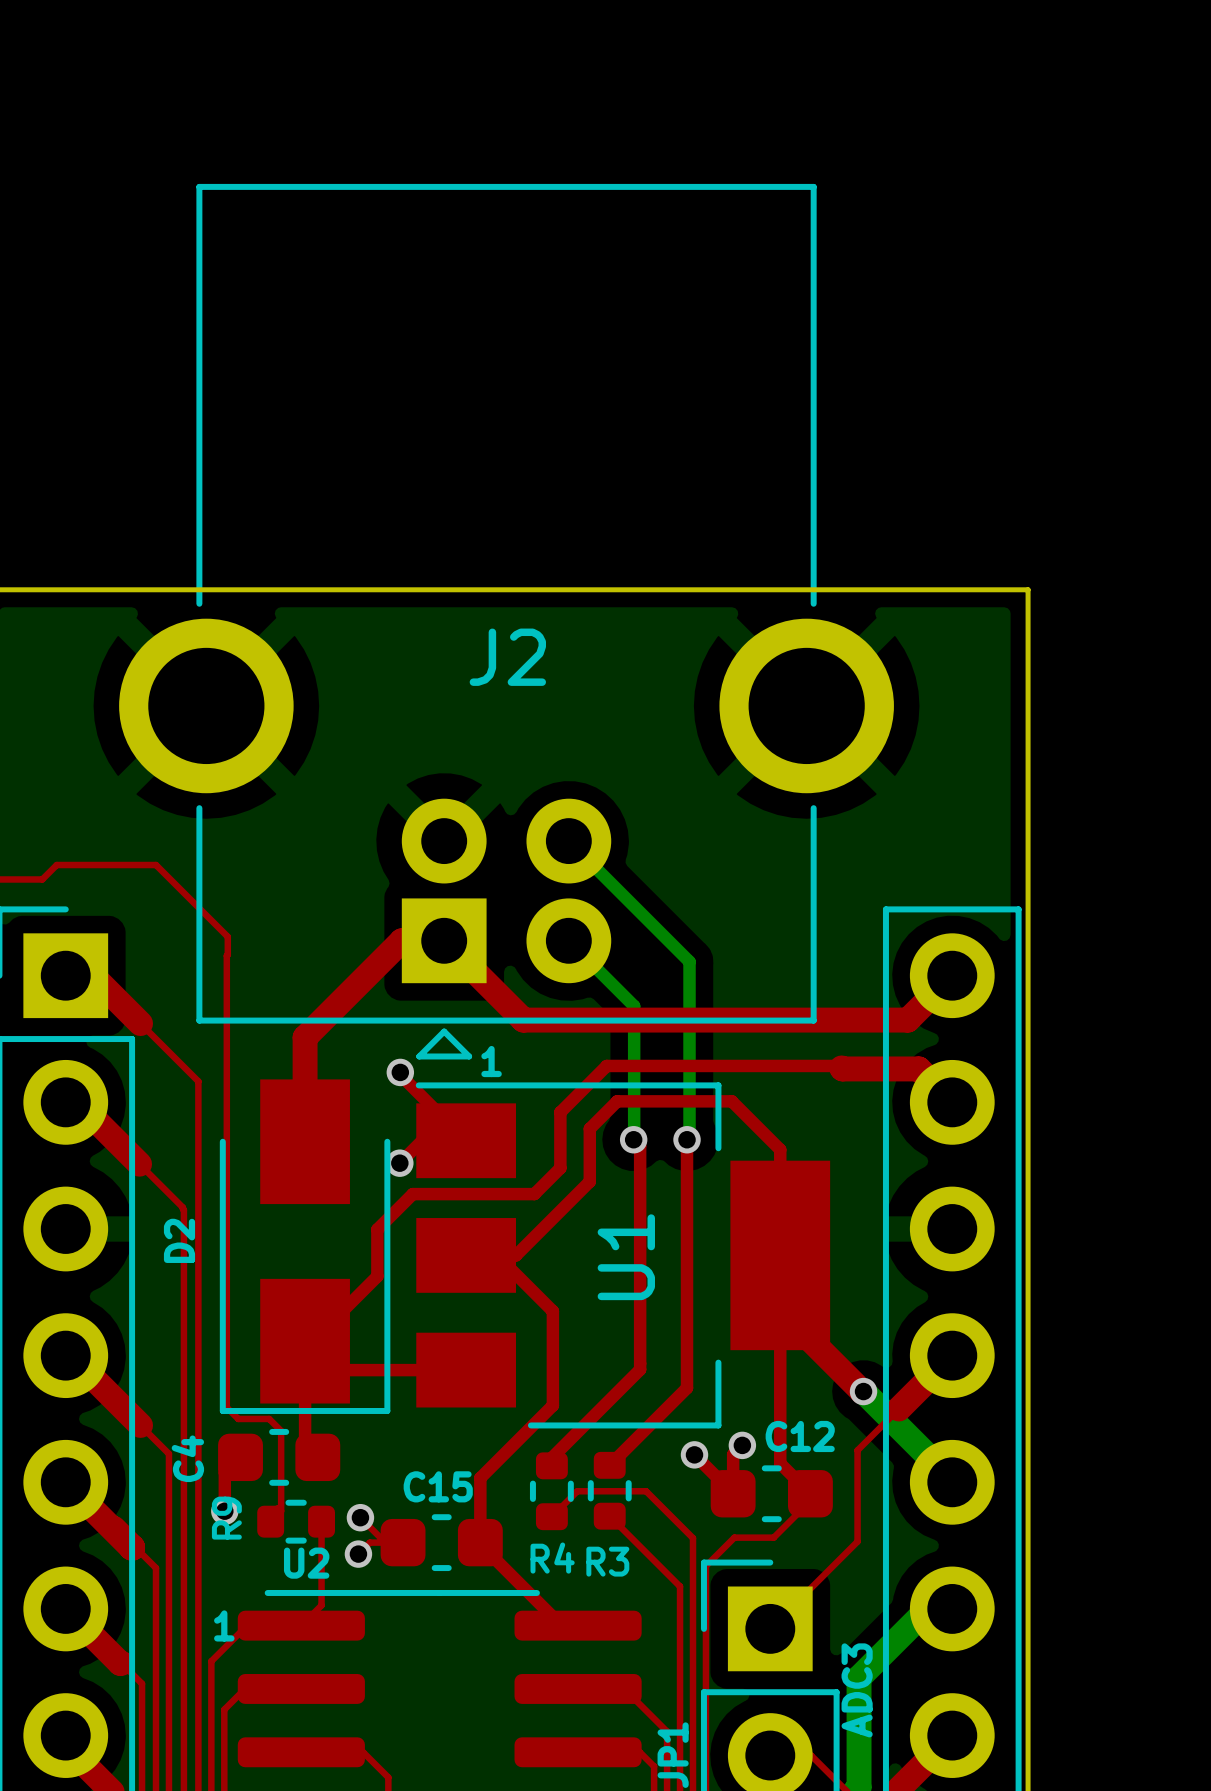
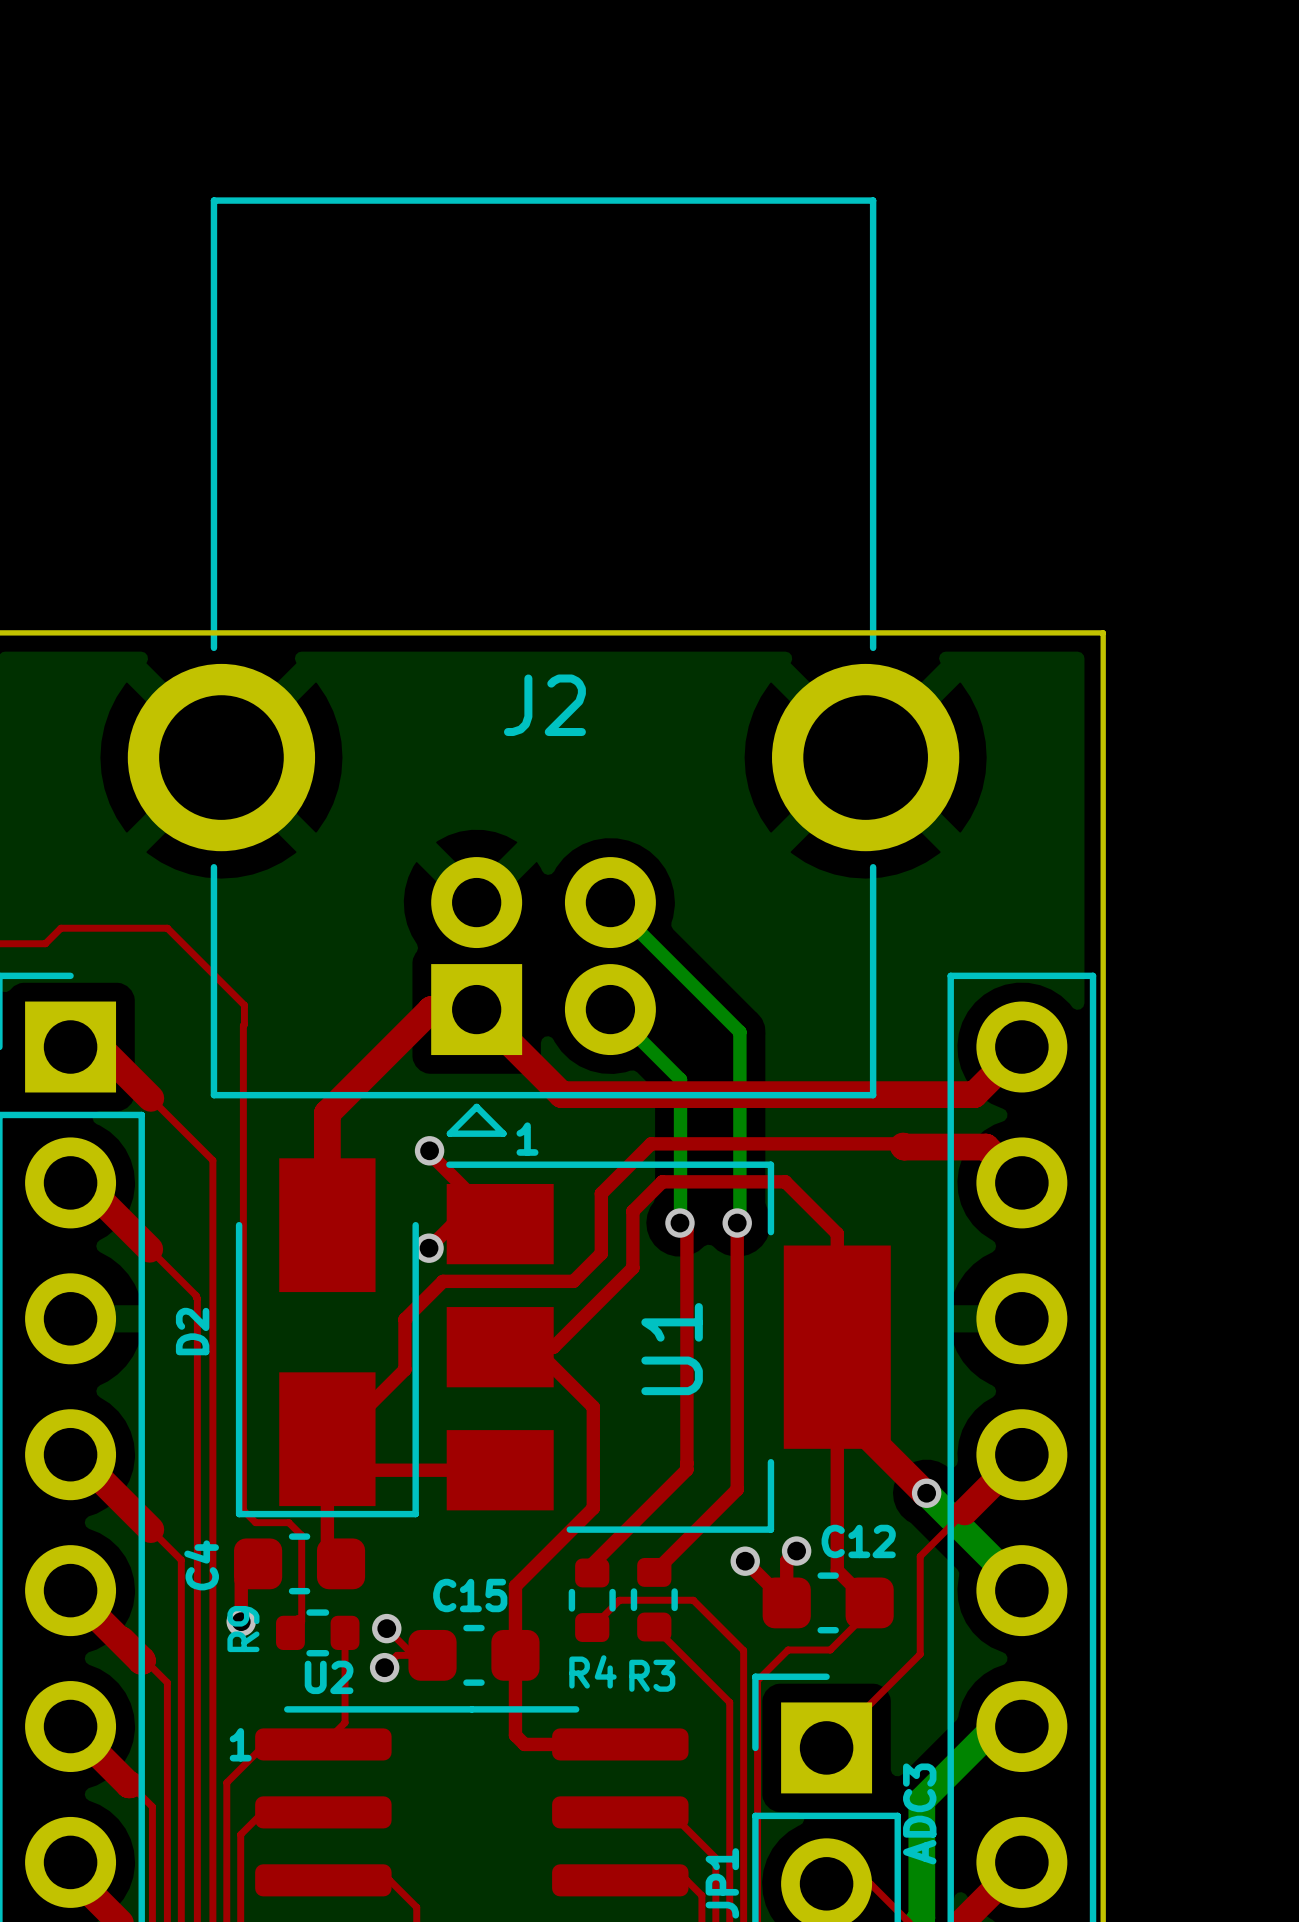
top track: (480, 1544) (561, 1625) -> (515, 1657) (515, 1735) (524, 1744) (602, 1744)

